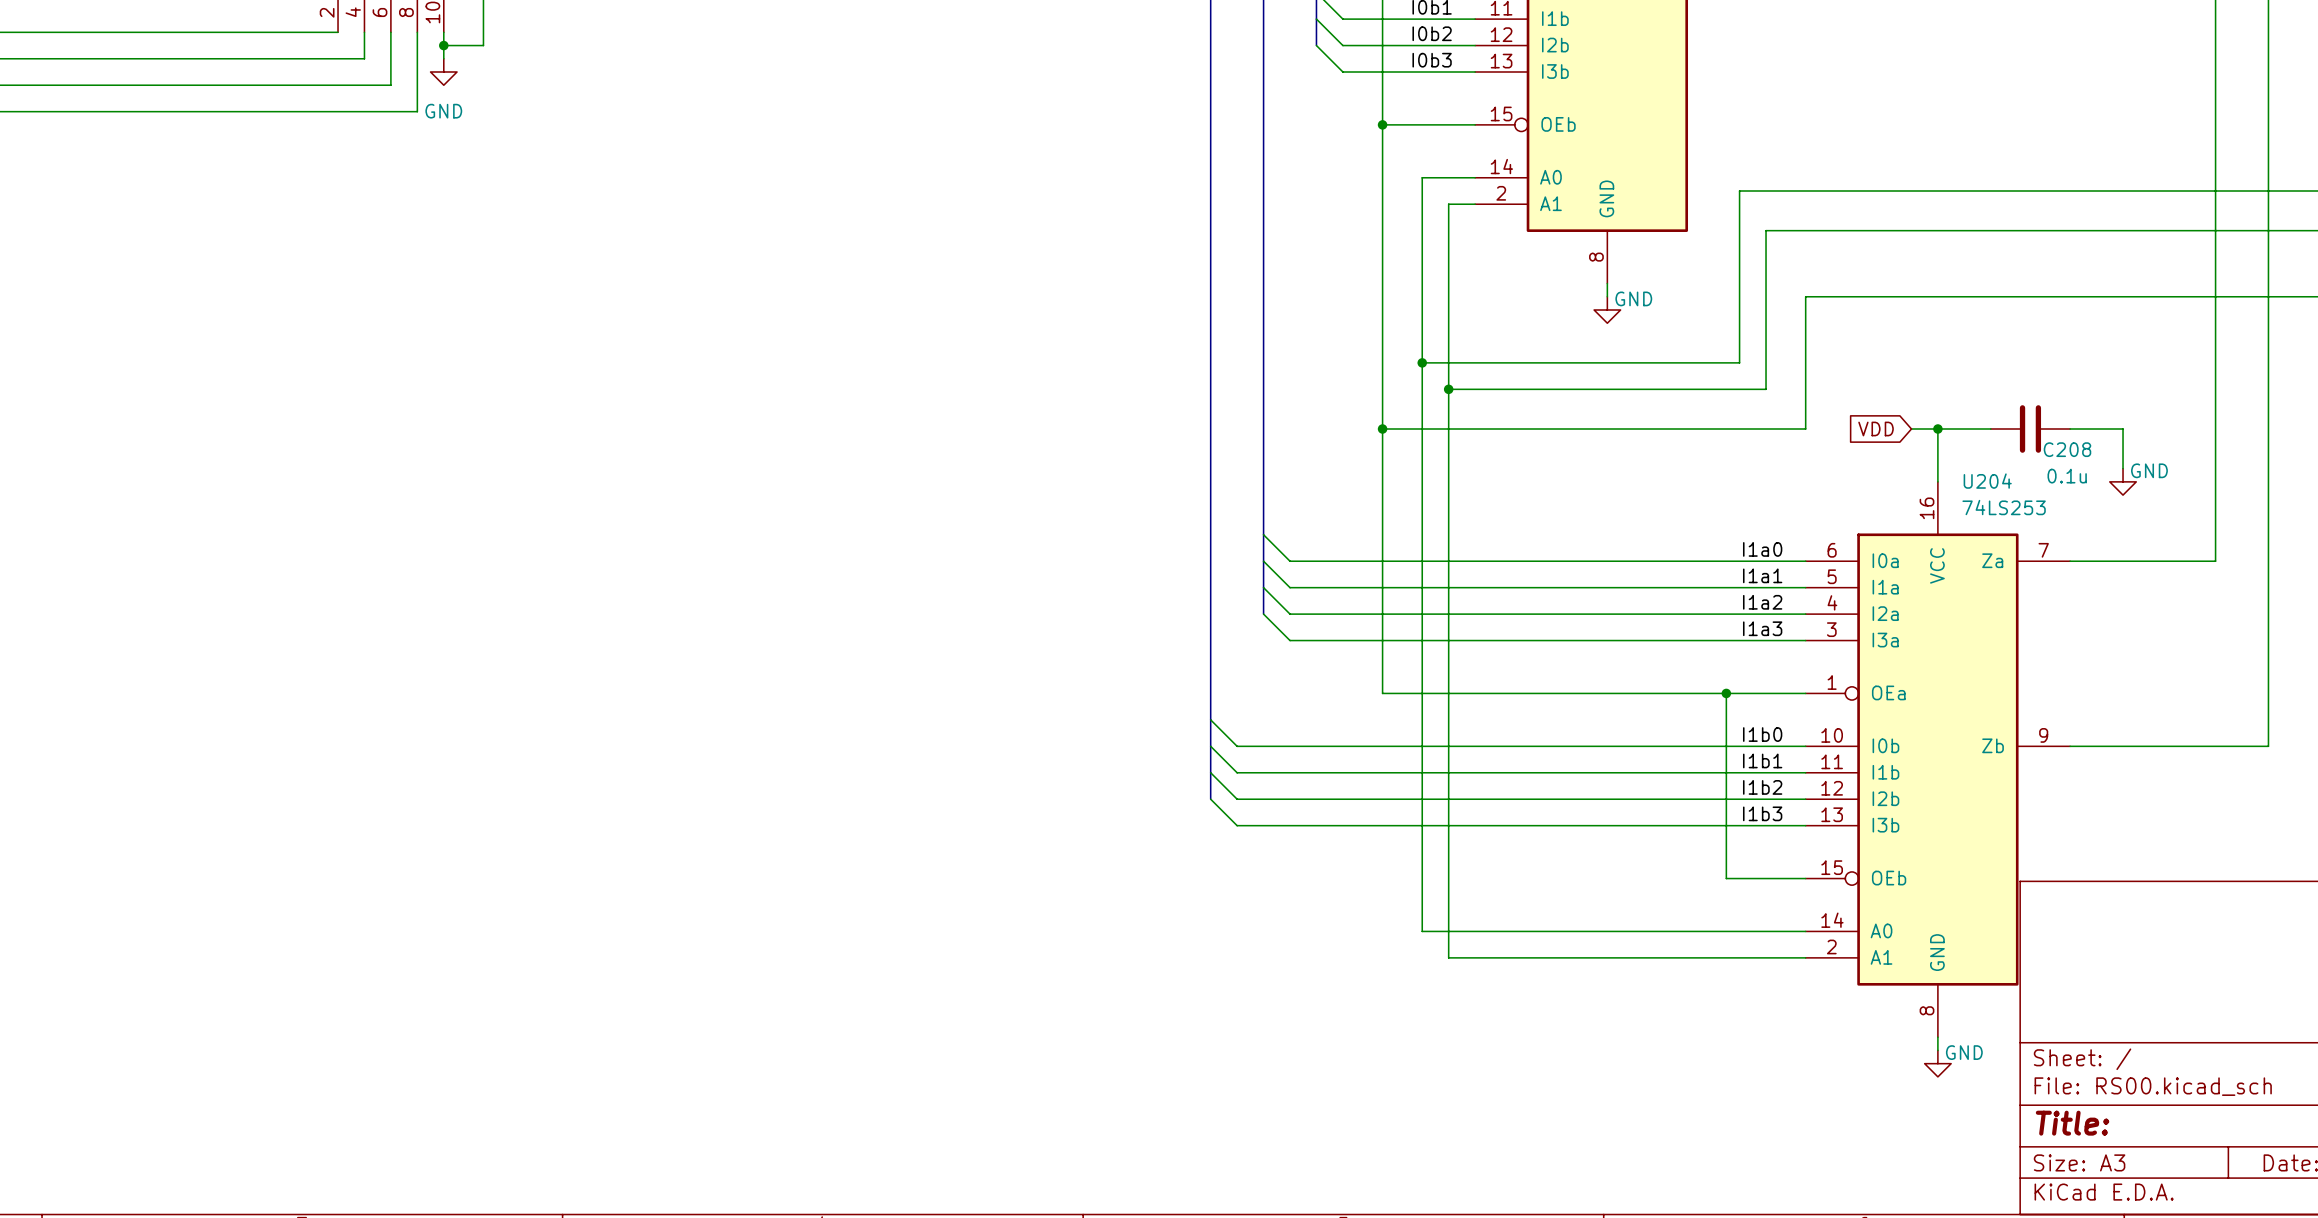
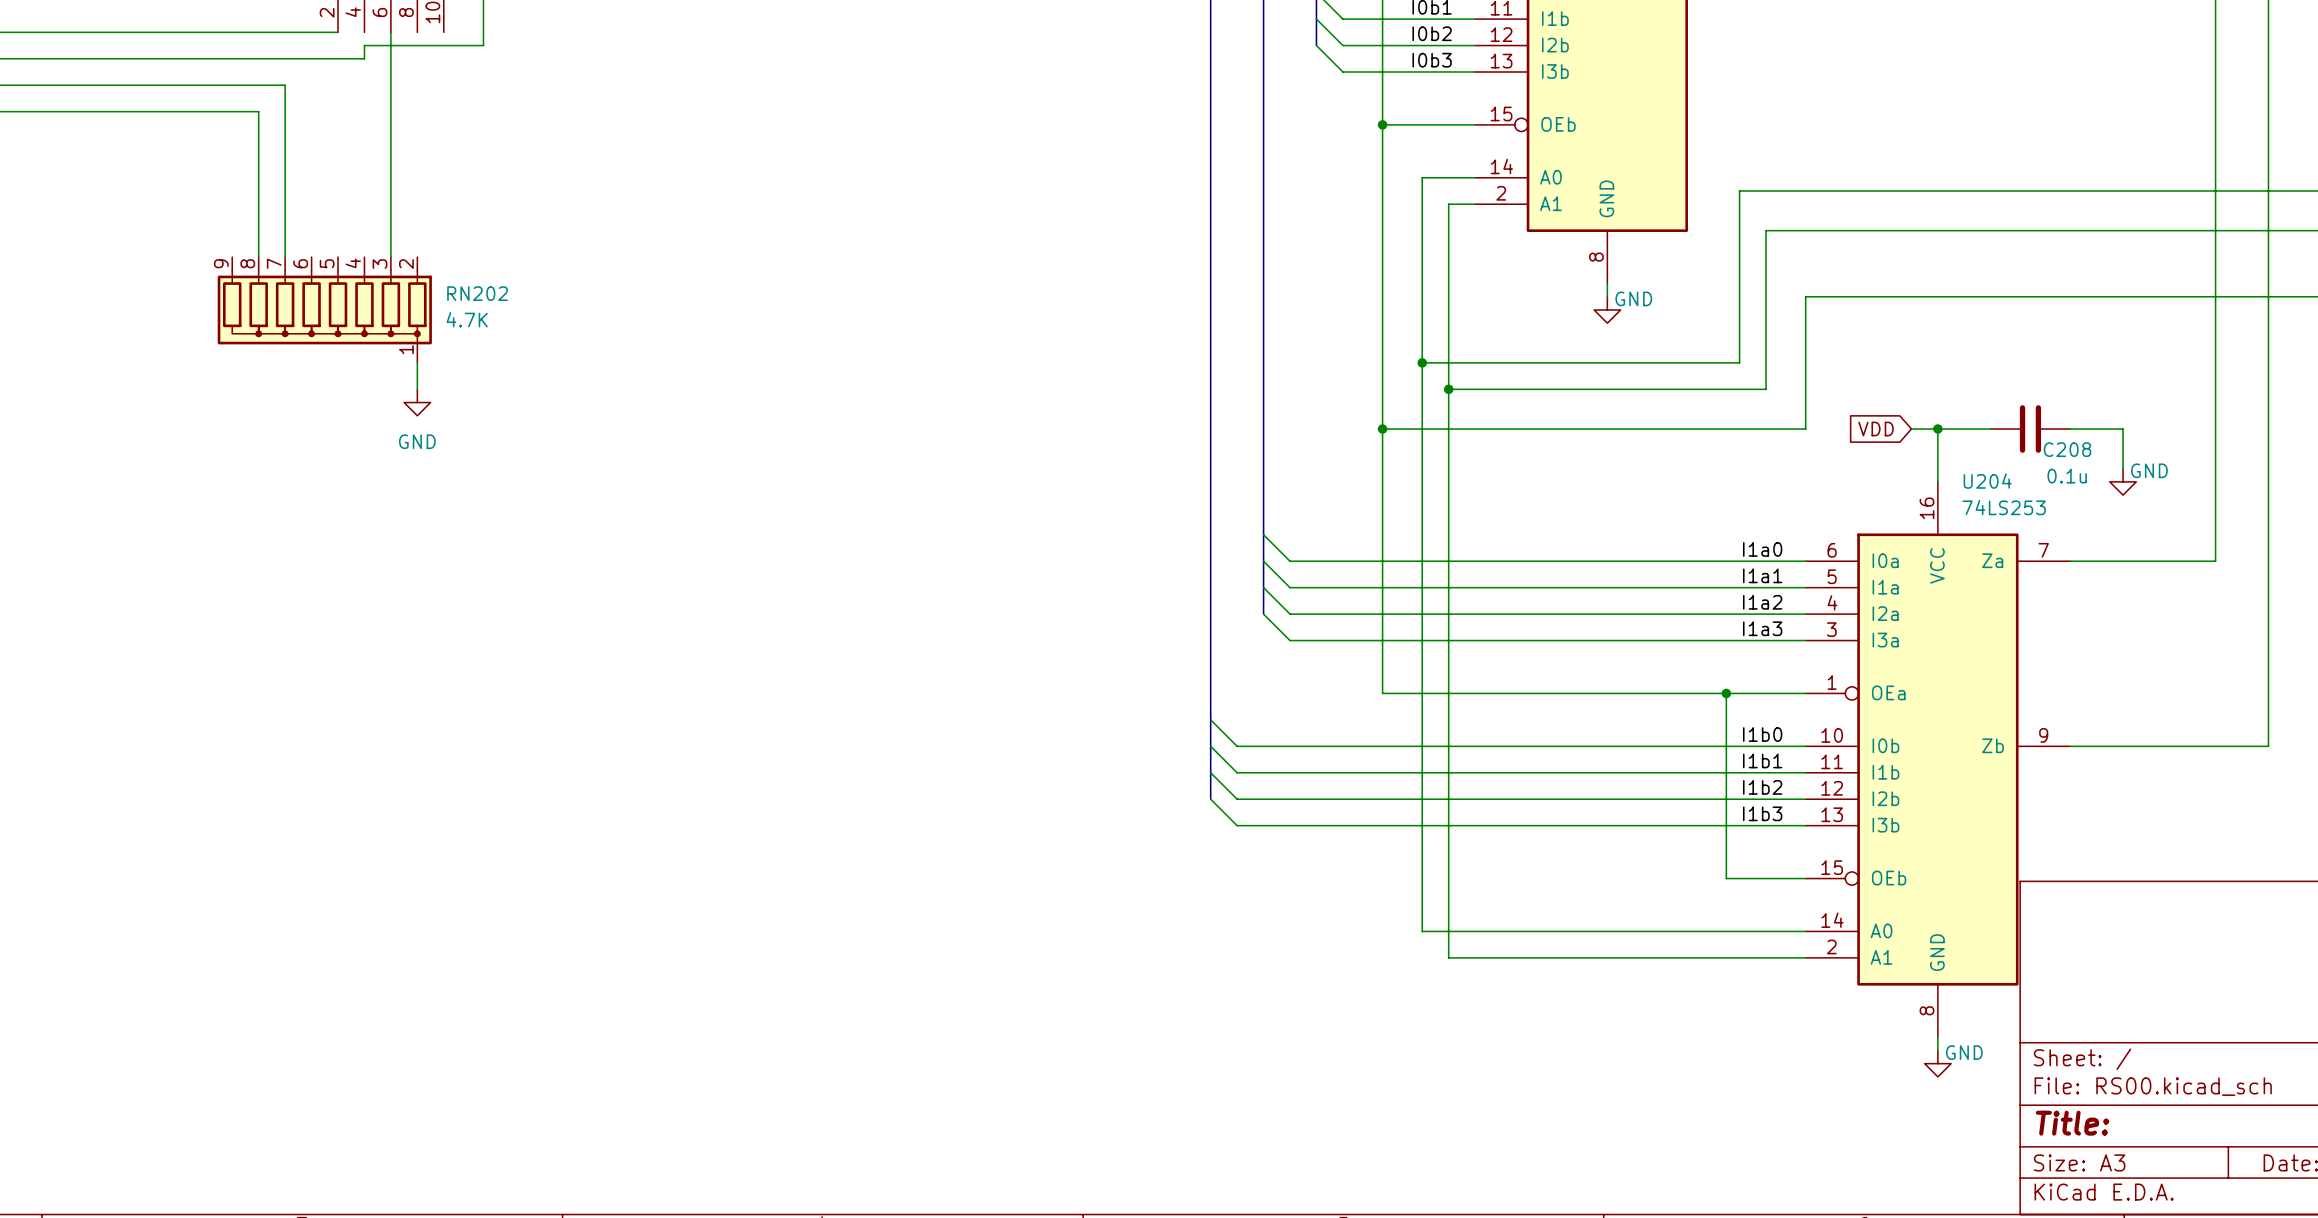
wire: (364, 32) (364, 45) -> (443, 45) (364, 45)
wire: (417, 32) (417, 111) (258, 111) -> (258, 257) (258, 111)
wire: (443, 32) (443, 58) -> none
junction: (443, 45) -> none
power symbol: GND (443, 71) -> none
wire: (285, 85) (390, 85) -> (285, 85) (285, 257)
wire: none -> (390, 85) (390, 257)
RN202: none -> 4.7K (324, 309)
wire: none -> (417, 362) (417, 389)
power symbol: none -> GND (417, 402)

